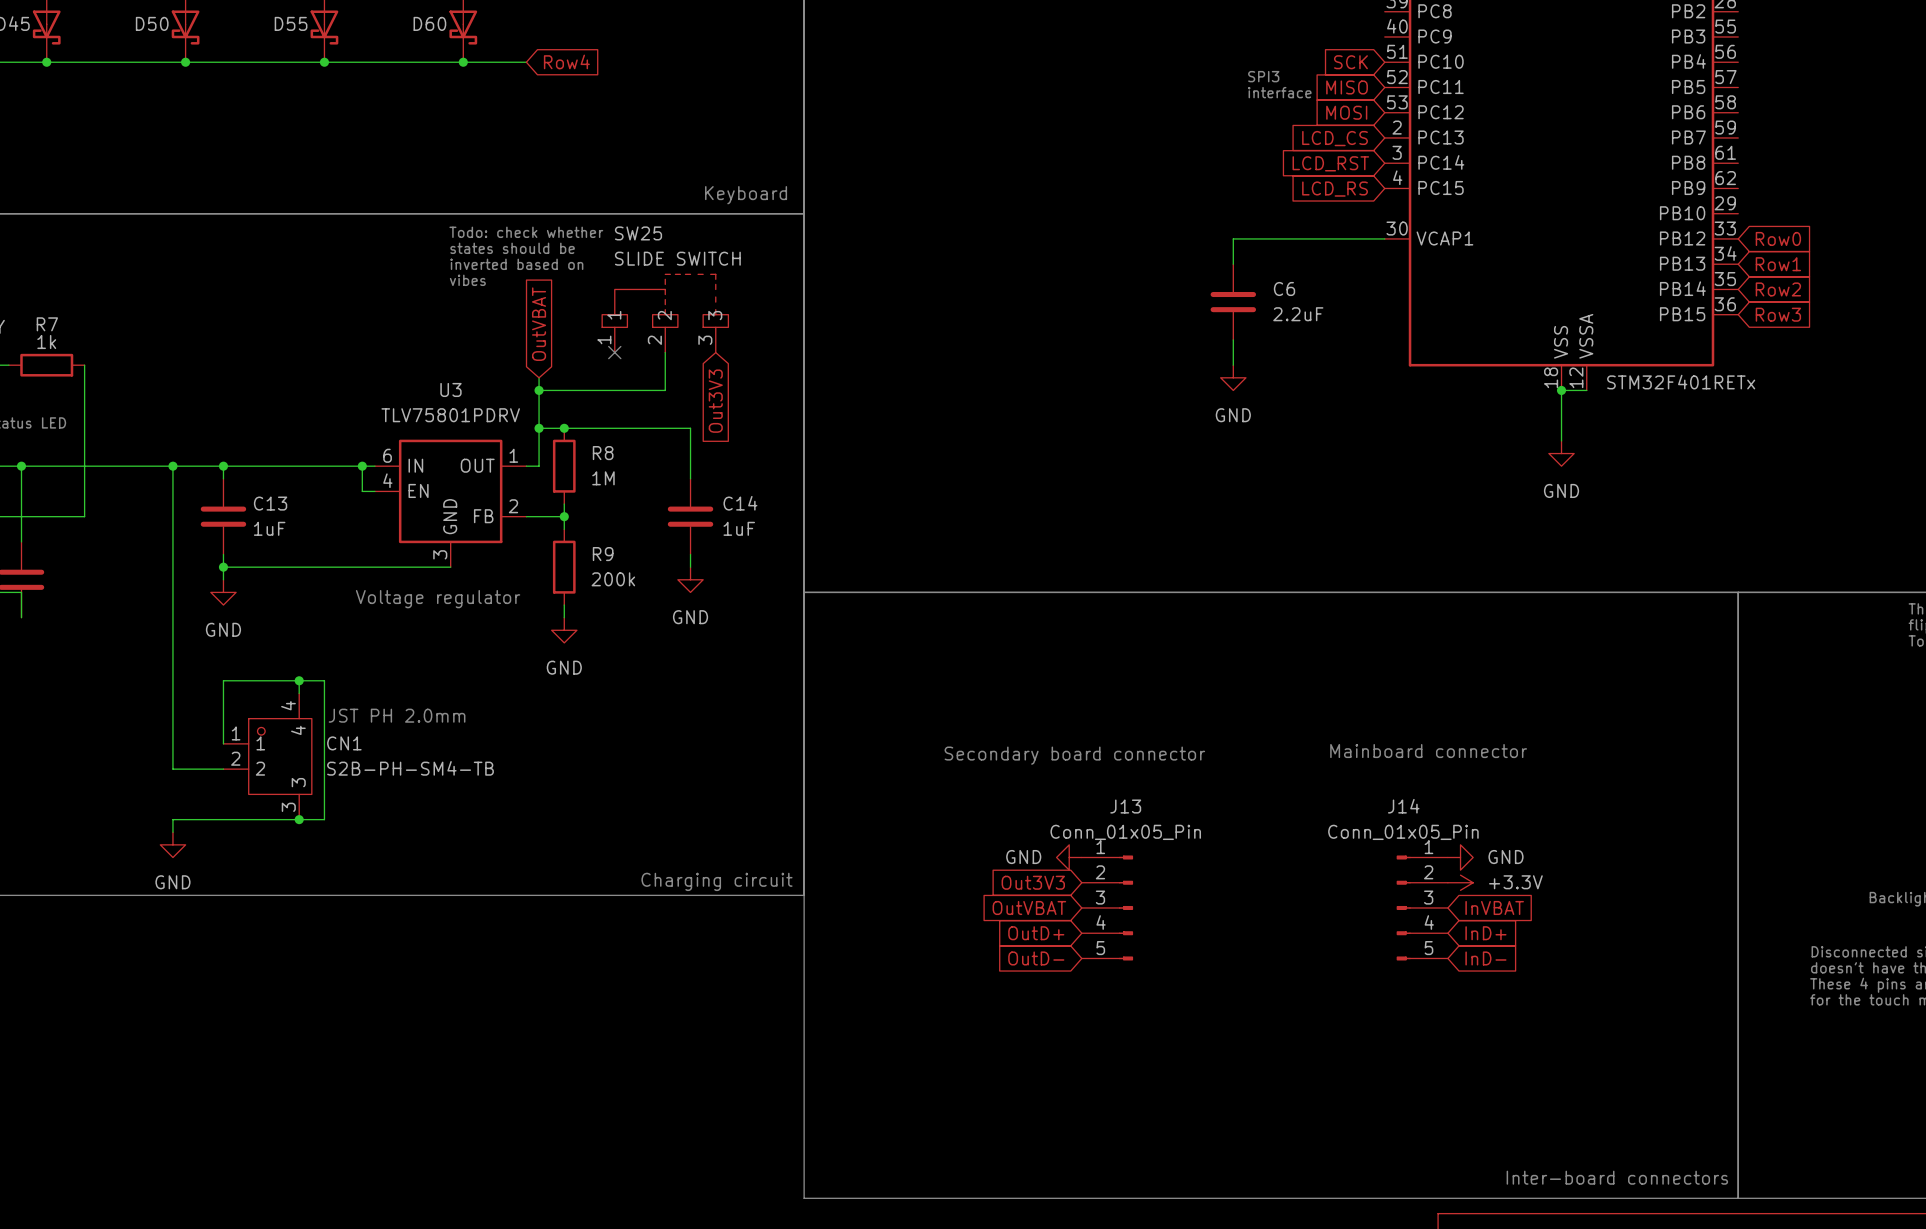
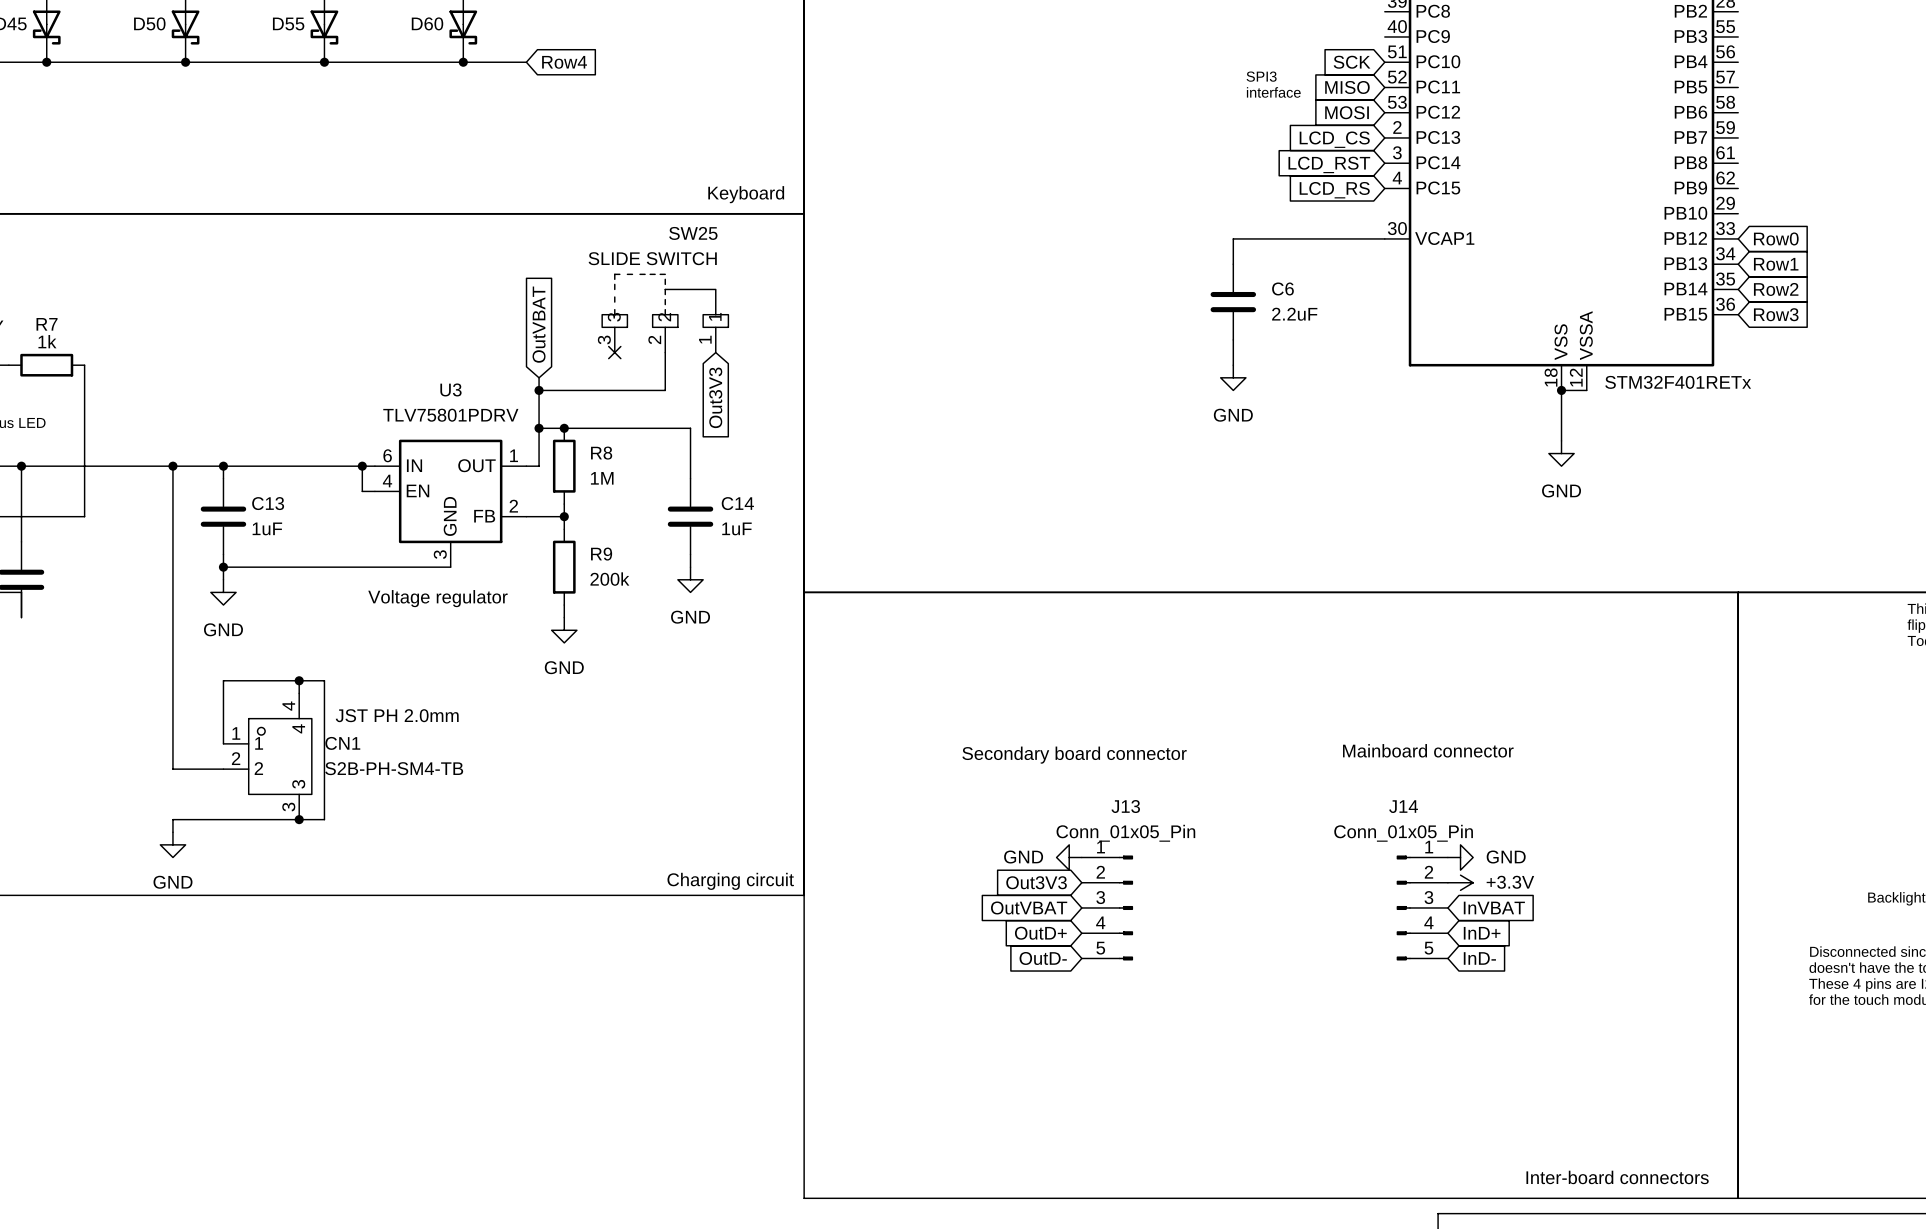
text: Todo: check whether (526, 232) -> none
text: states should be (512, 248) -> none
text: inverted based on (516, 264) -> none
text: vibes (467, 280) -> none
SW25 flip: as is (665, 300) -> left-right (665, 300)

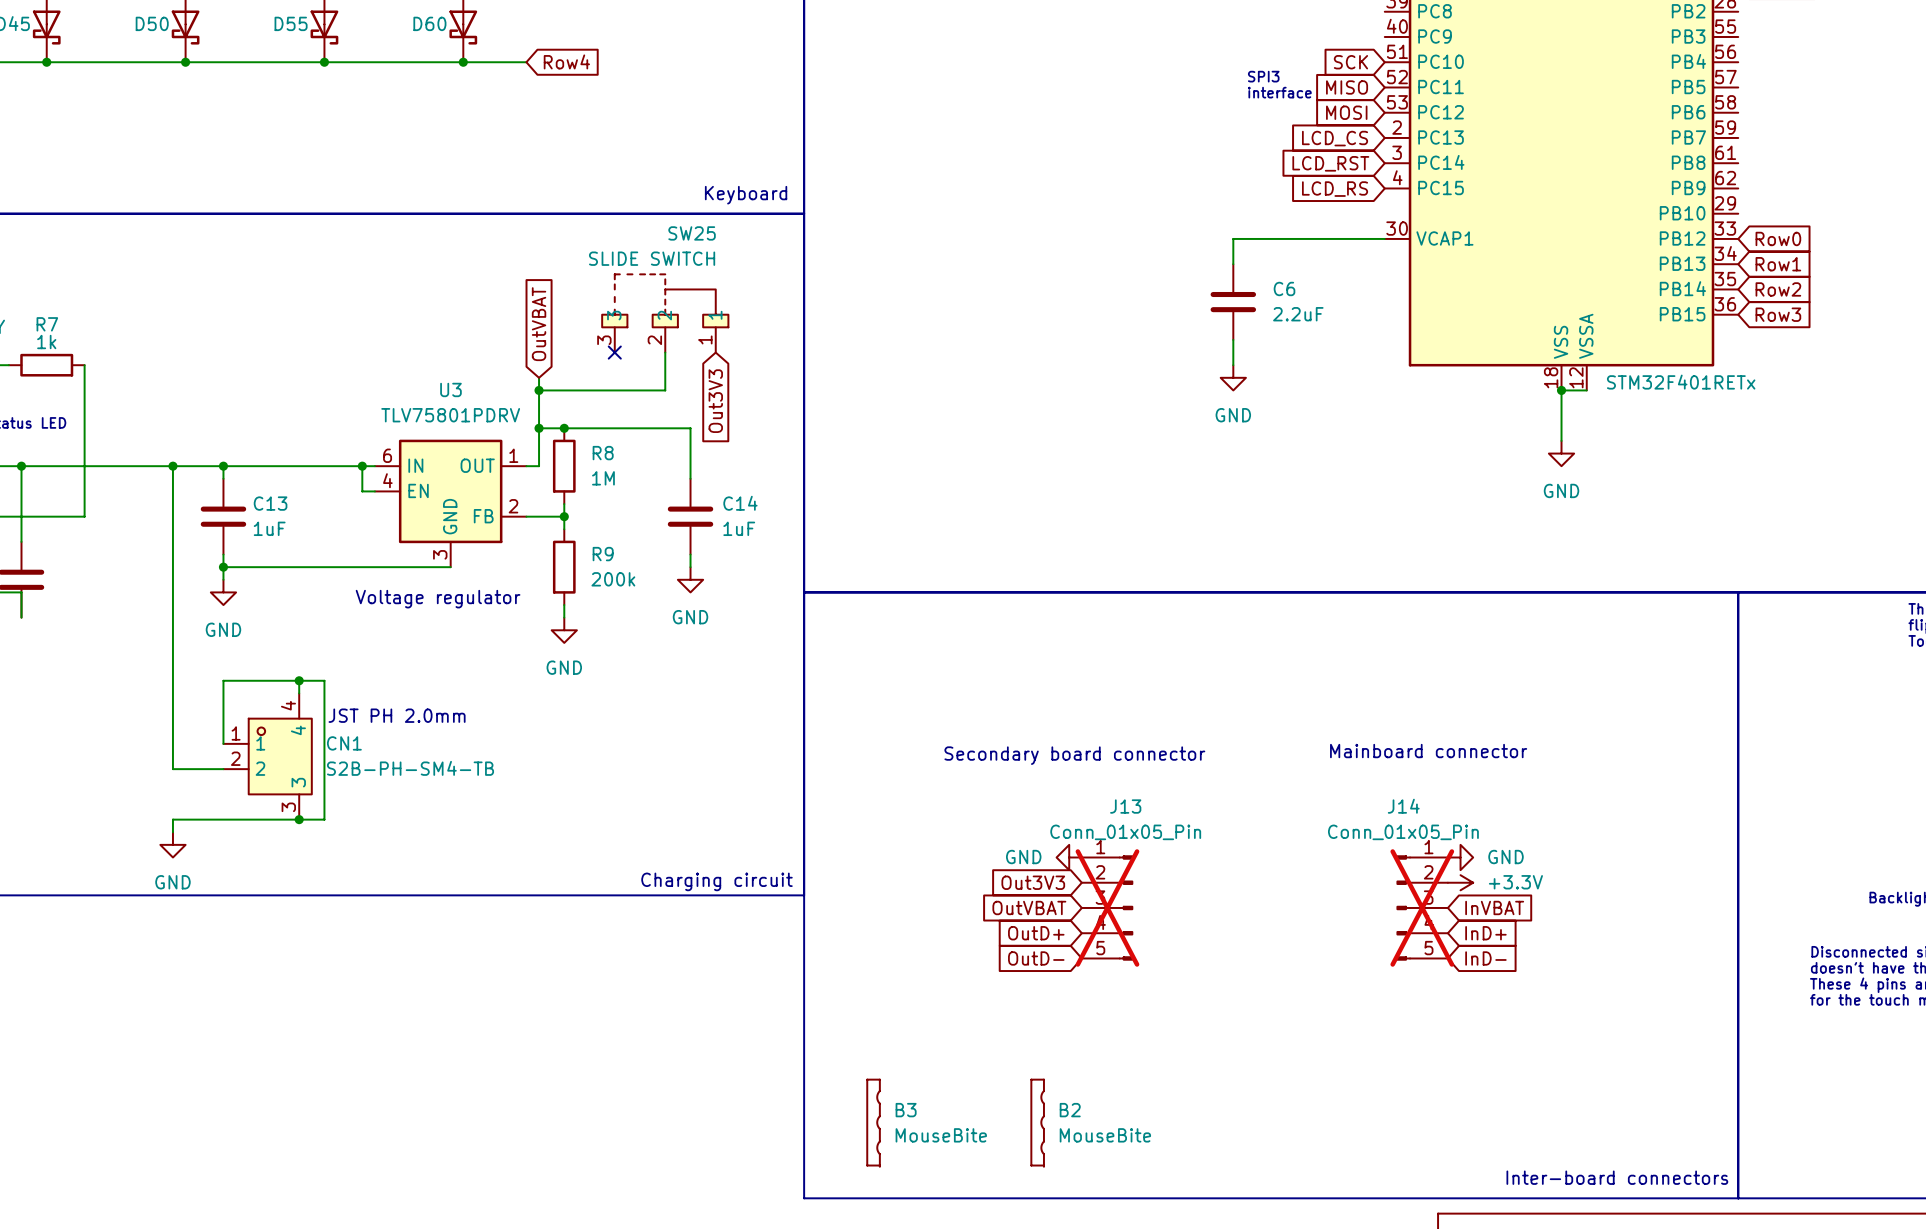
J13 do-not-place cross: none -> (1107, 907)
J14 do-not-place cross: none -> (1422, 907)
B3: none -> MouseBite (873, 1123)
B2: none -> MouseBite (1037, 1123)

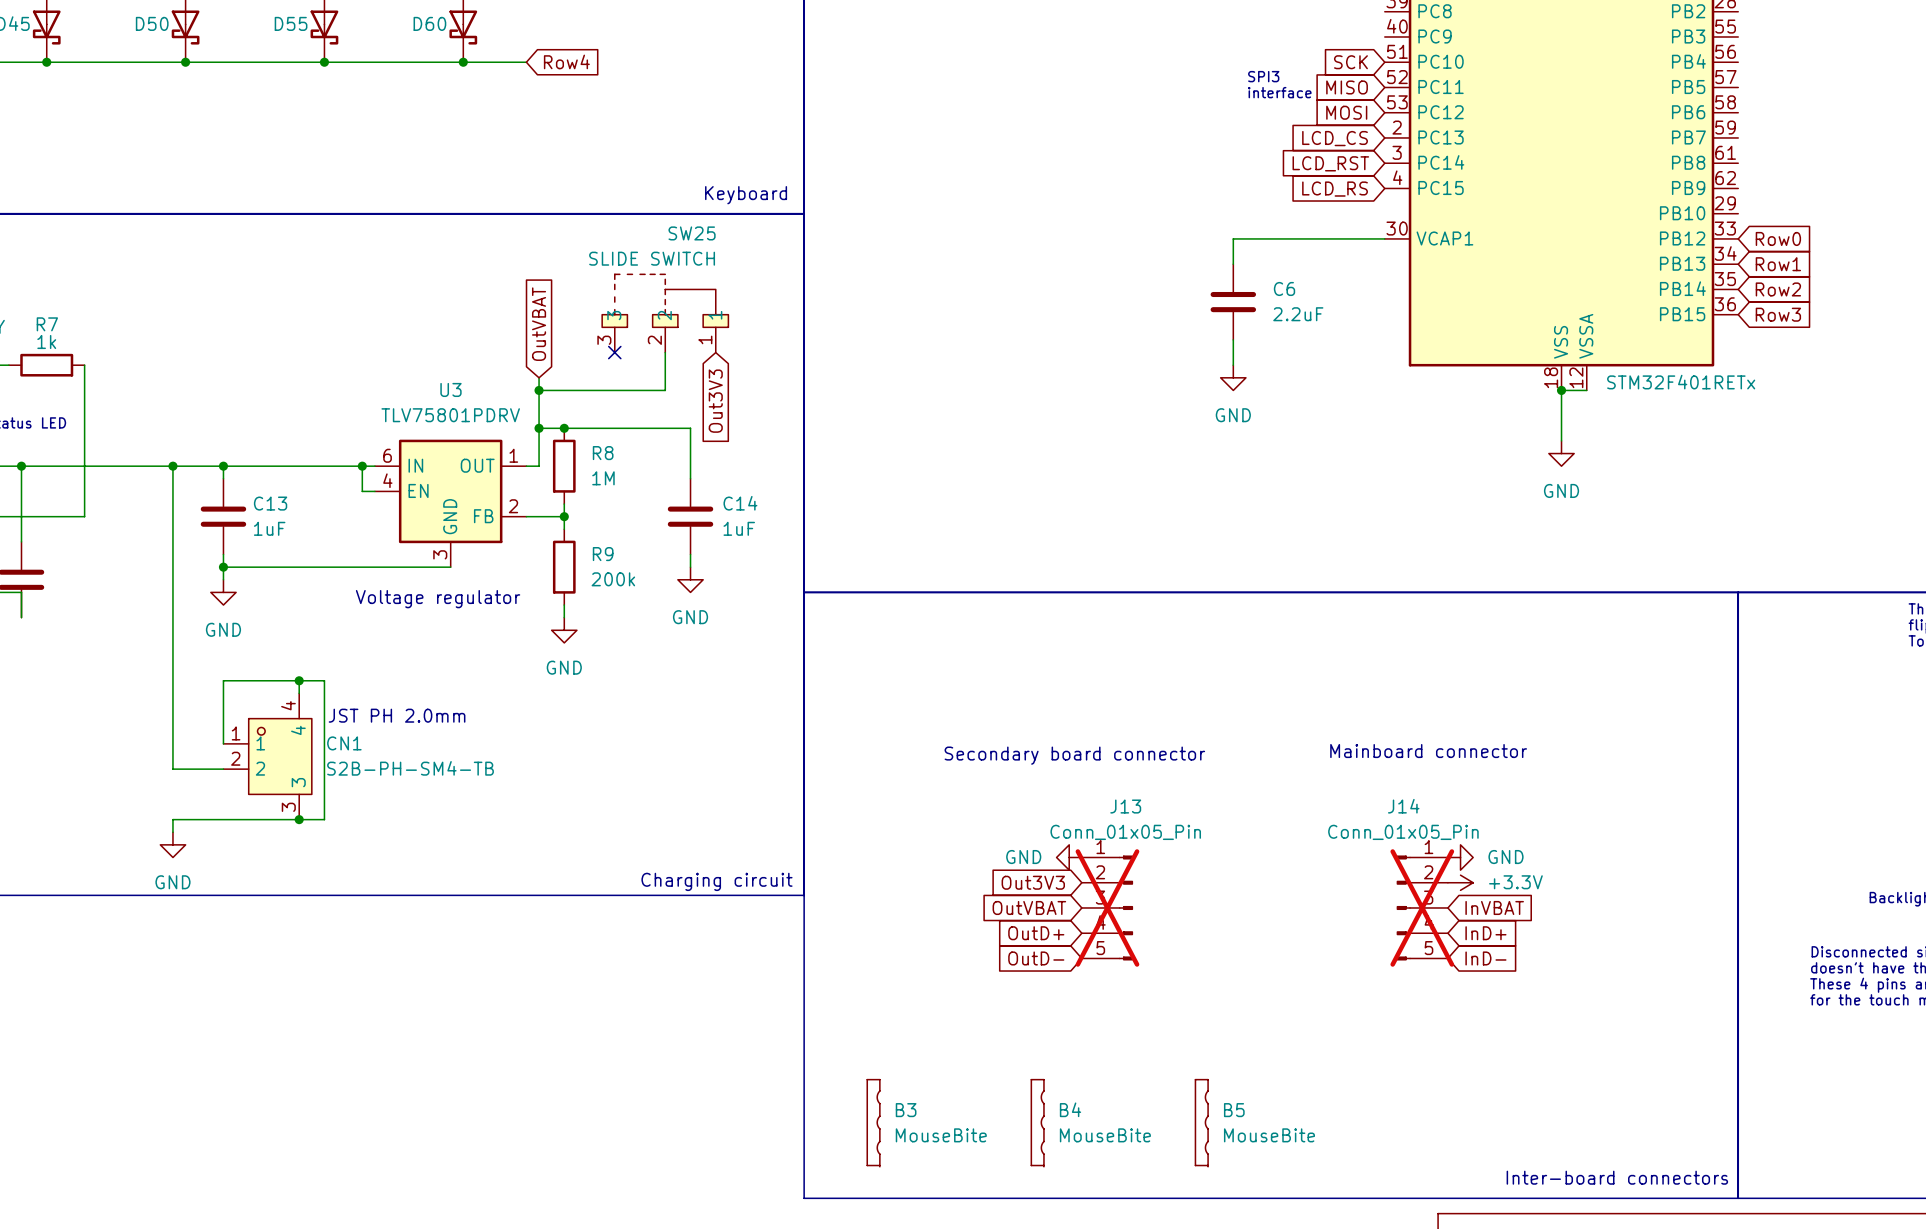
B2 name: B2 (1070, 1110) -> B4 (1070, 1109)
B5: none -> MouseBite (1201, 1123)

